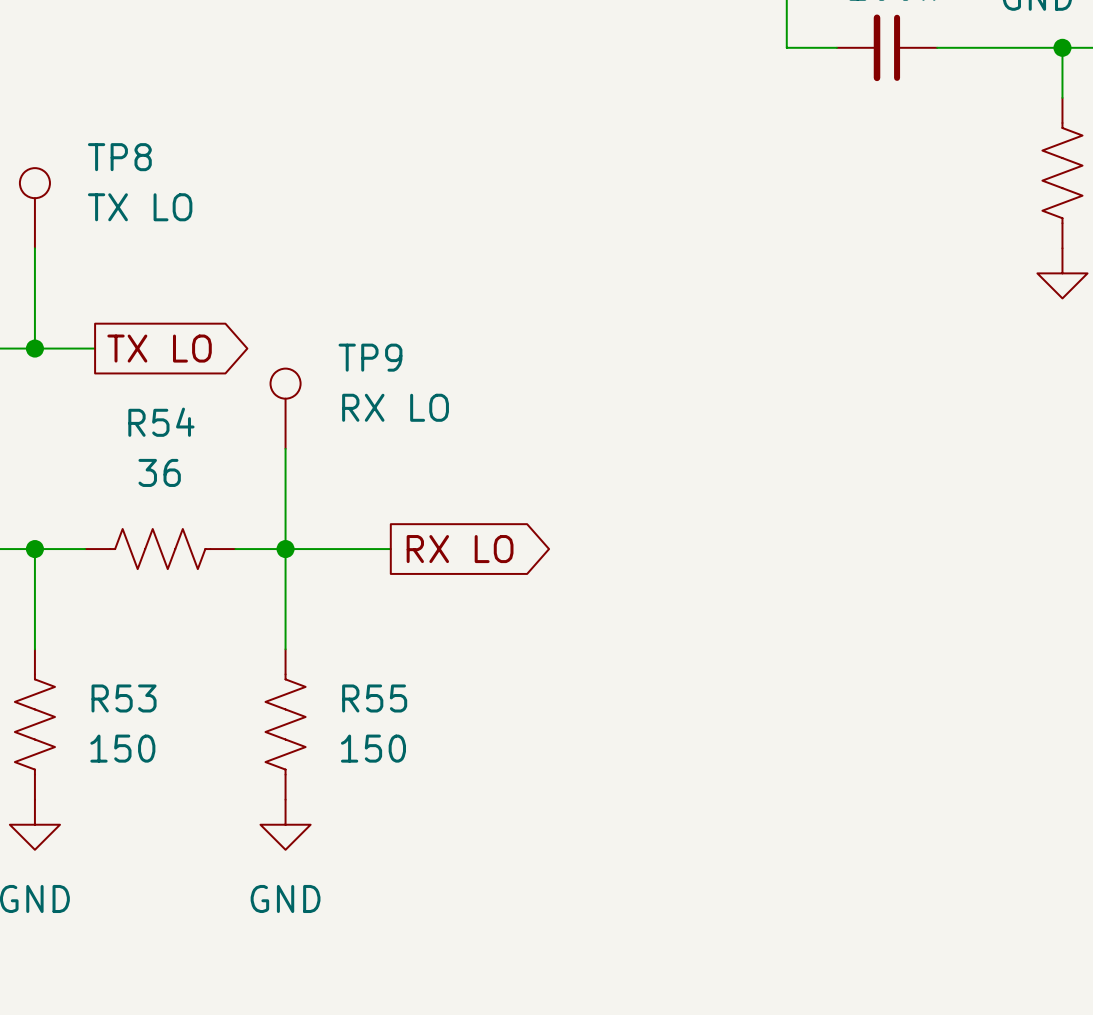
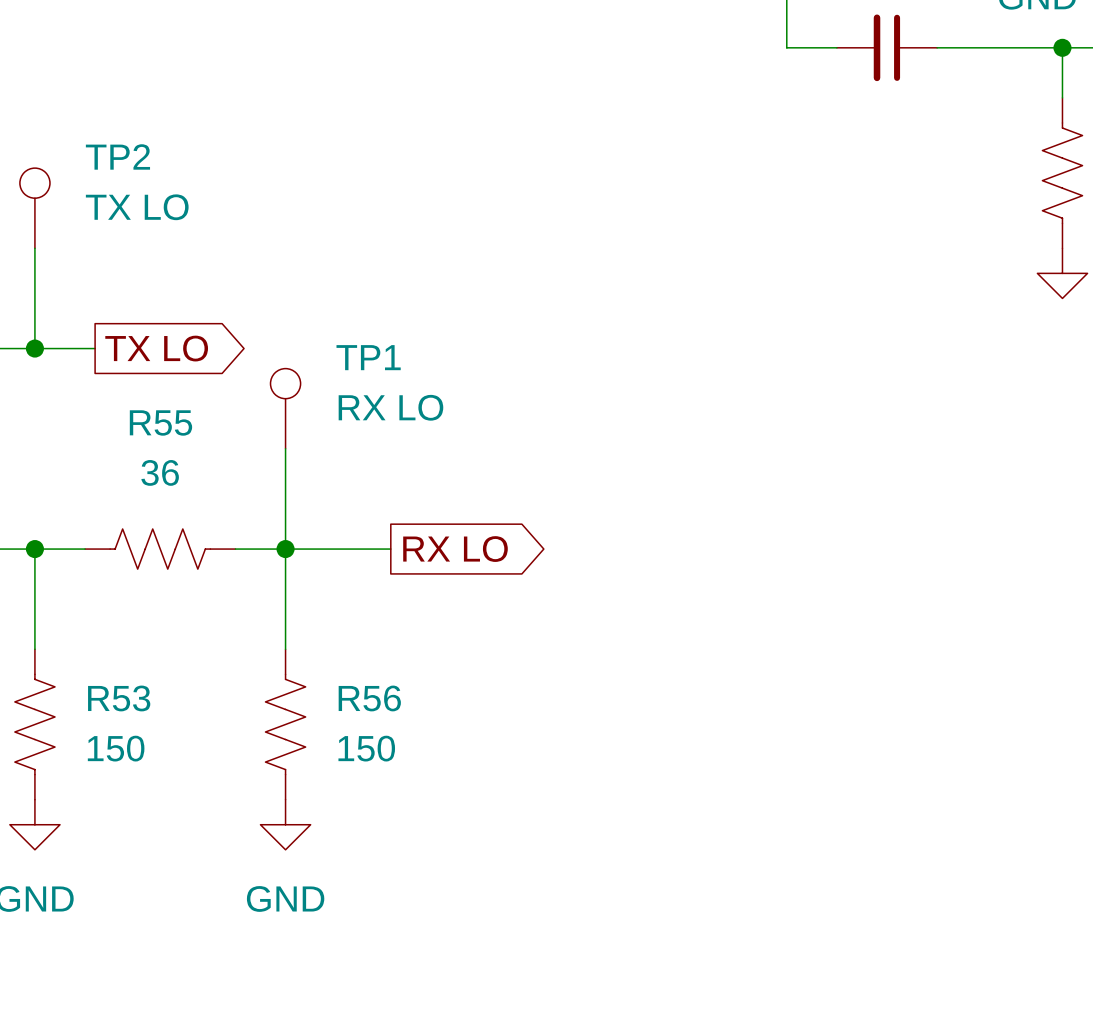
TP8 name: TP8 (119, 157) -> TP2 (117, 156)
TP9 name: TP9 (370, 357) -> TP1 (368, 357)
R54 name: R54 (161, 422) -> R55 (160, 422)
R55 name: R55 (374, 698) -> R56 (369, 698)

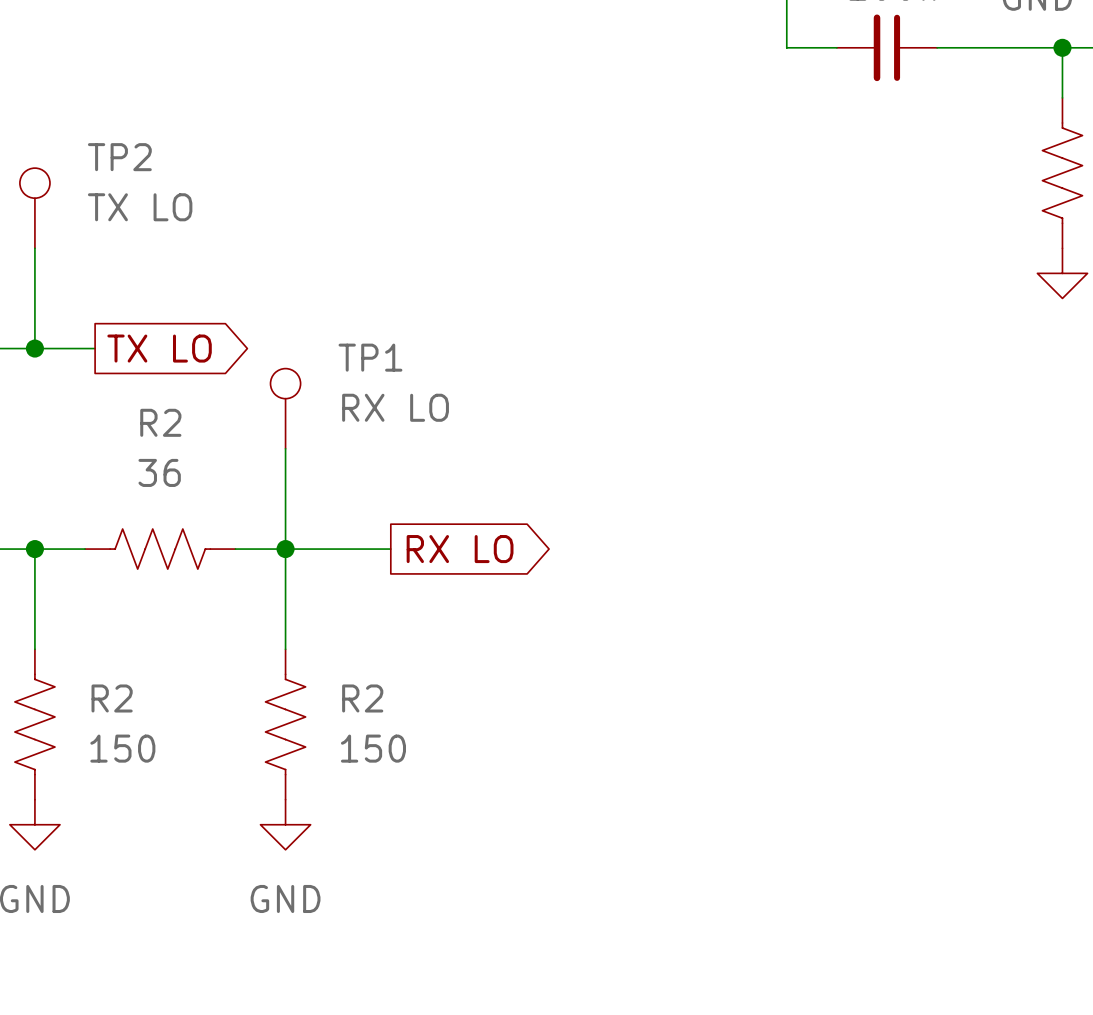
R55 name: R55 (160, 422) -> R2 (160, 422)
R53 name: R53 (119, 698) -> R2 (112, 698)
R56 name: R56 (369, 698) -> R2 (362, 698)

